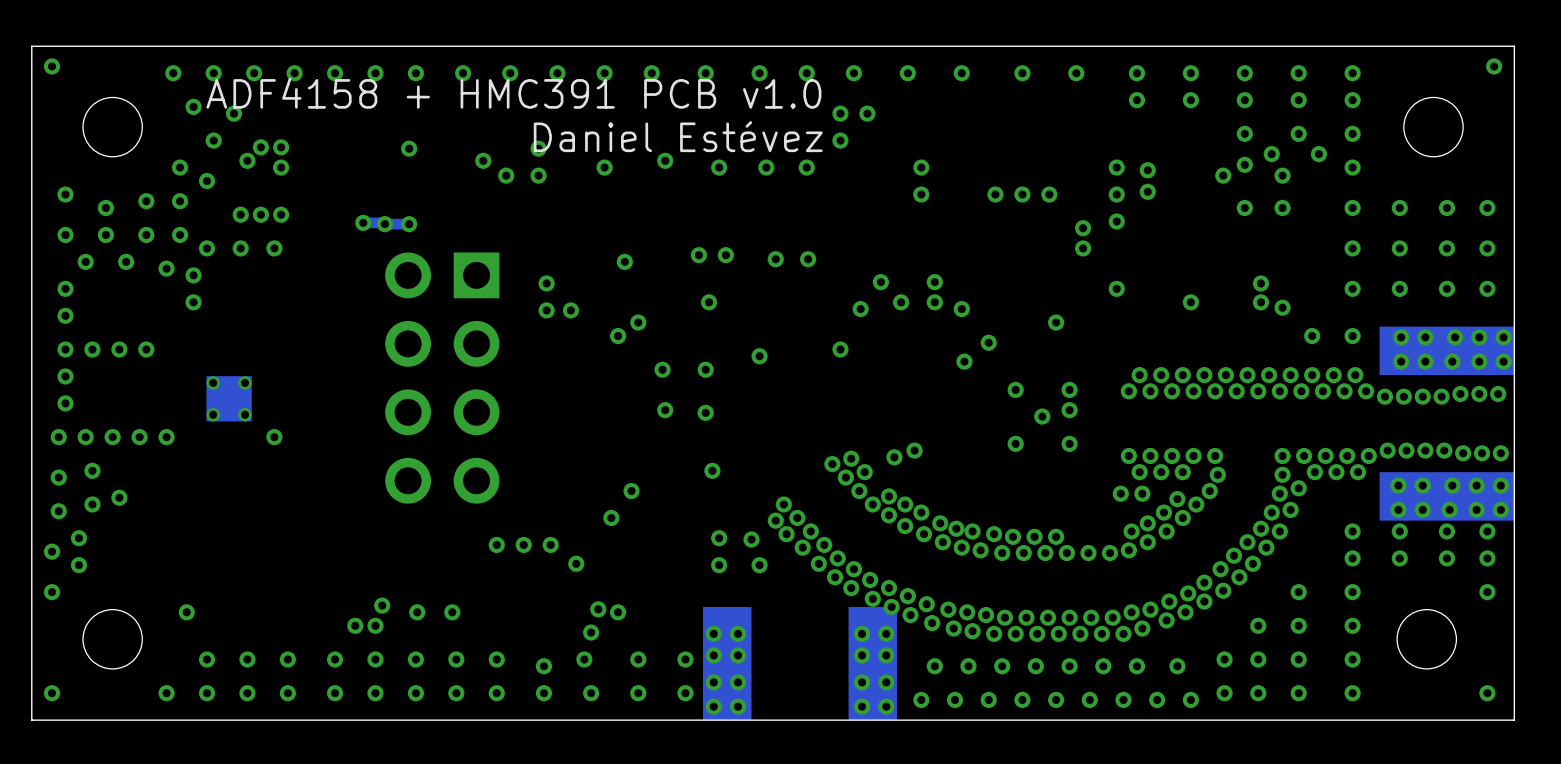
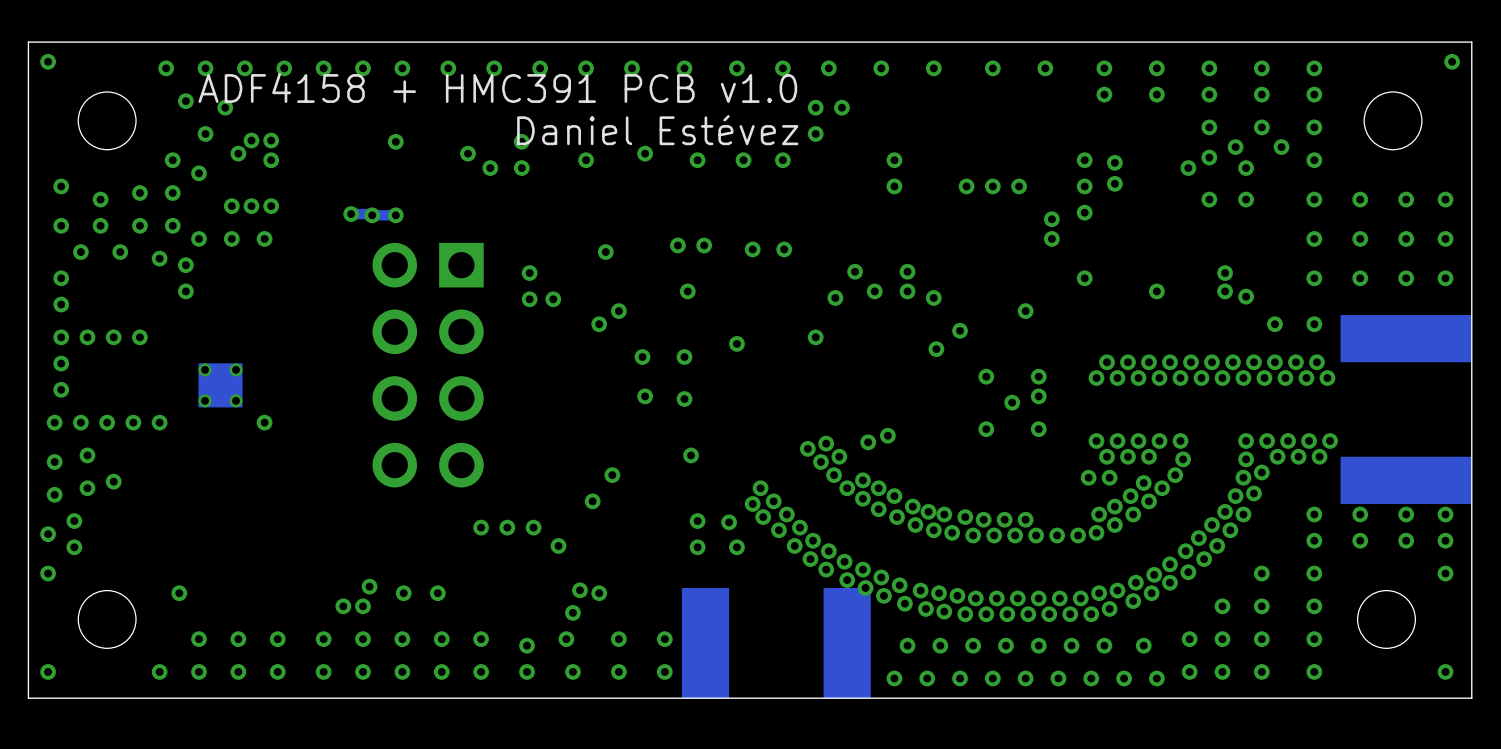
via: (1401, 337) -> none
via: (1425, 337) -> none
via: (1455, 337) -> none
via: (1479, 337) -> none
via: (1503, 337) -> none
via: (1401, 361) -> none
via: (1425, 361) -> none
via: (1452, 361) -> none
via: (1479, 361) -> none
via: (1503, 361) -> none
via: (1460, 393) -> none
via: (1479, 393) -> none
via: (1498, 393) -> none
via: (1384, 396) -> none
via: (1403, 396) -> none
via: (1422, 396) -> none
via: (1441, 396) -> none
via: (1387, 450) -> none
via: (1406, 450) -> none
via: (1425, 450) -> none
via: (1444, 450) -> none
via: (1463, 453) -> none
via: (1482, 453) -> none
via: (1500, 453) -> none
via: (1398, 485) -> none
via: (1422, 485) -> none
via: (1452, 485) -> none
via: (1476, 485) -> none
via: (1500, 485) -> none
via: (1398, 509) -> none
via: (1422, 509) -> none
via: (1449, 509) -> none
via: (1476, 509) -> none
via: (1500, 509) -> none
via: (713, 633) -> none
via: (738, 633) -> none
via: (862, 633) -> none
via: (886, 633) -> none
via: (713, 655) -> none
via: (738, 655) -> none
via: (862, 655) -> none
via: (886, 655) -> none
via: (713, 682) -> none
via: (738, 682) -> none
via: (862, 682) -> none
via: (886, 682) -> none
via: (713, 706) -> none
via: (738, 706) -> none
via: (862, 706) -> none
via: (886, 706) -> none

